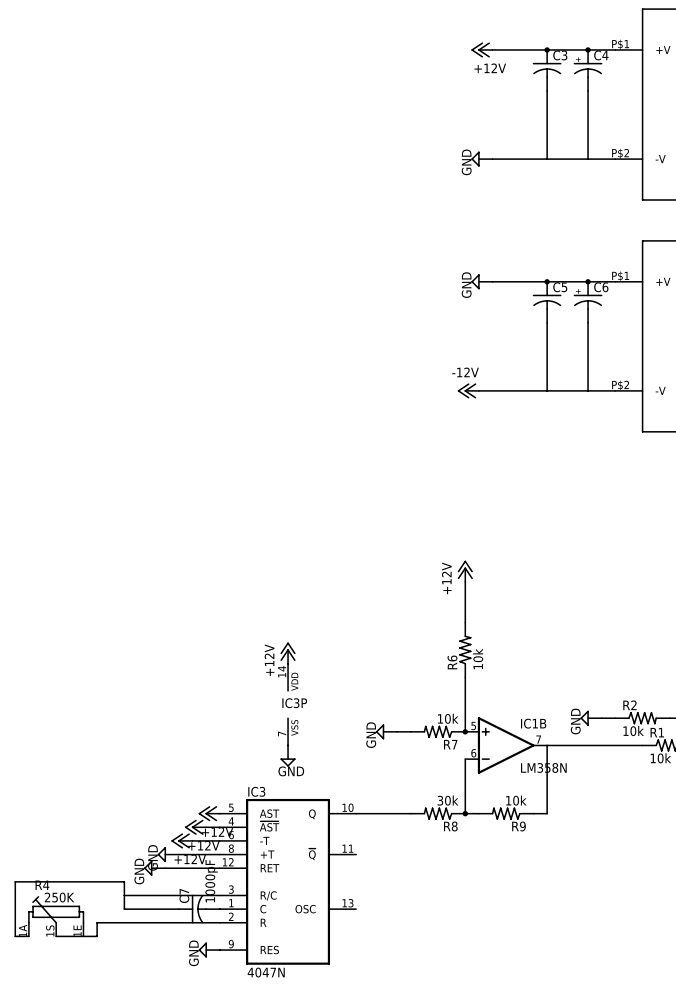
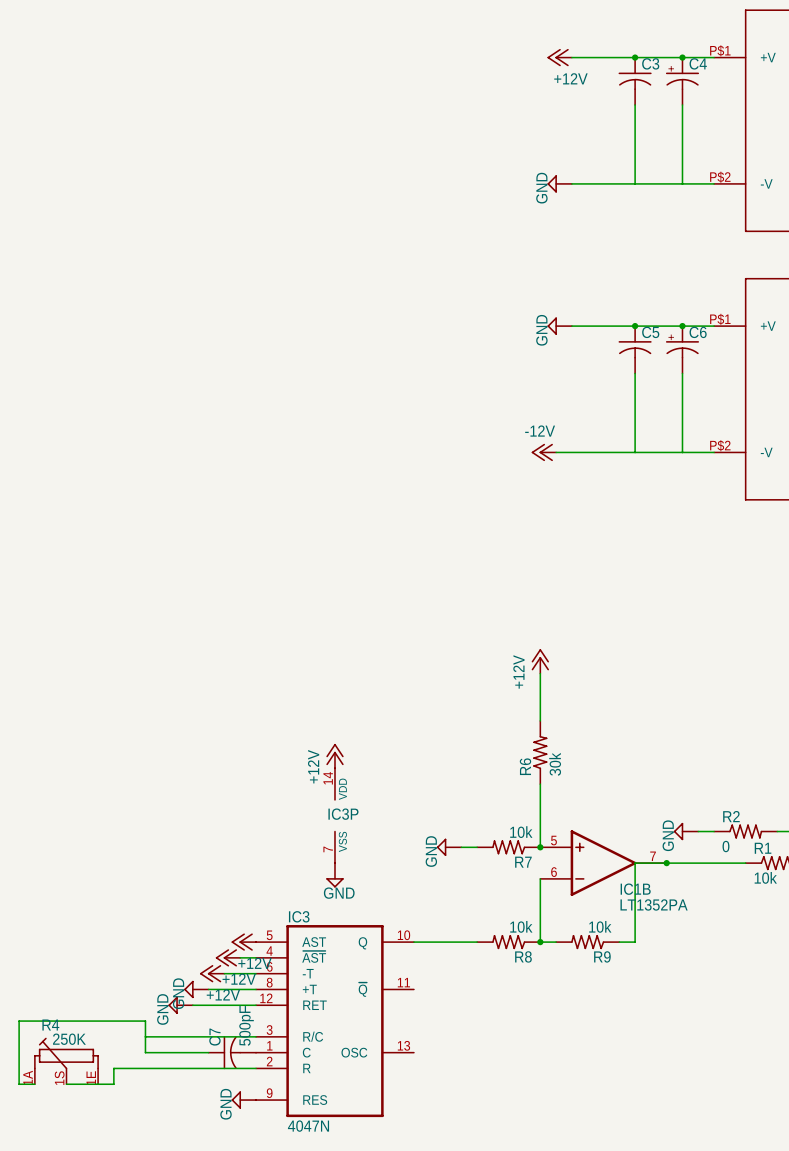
R6 value: 10k (478, 658) -> 30k (555, 764)
IC1B symbol: [465, 717, 548, 774] -> [540, 830, 667, 896]
IC1B name position: IC1B (533, 723) -> IC1B (635, 889)
R2 value: 10k (633, 731) -> 0 (725, 846)
junction: none -> (666, 863)
IC1B value: LM358N (543, 767) -> LT1352PA (654, 904)
R8 value: 30k (448, 800) -> 10k (521, 926)
C7 value: 1000pF (211, 881) -> 500pF (246, 1025)

